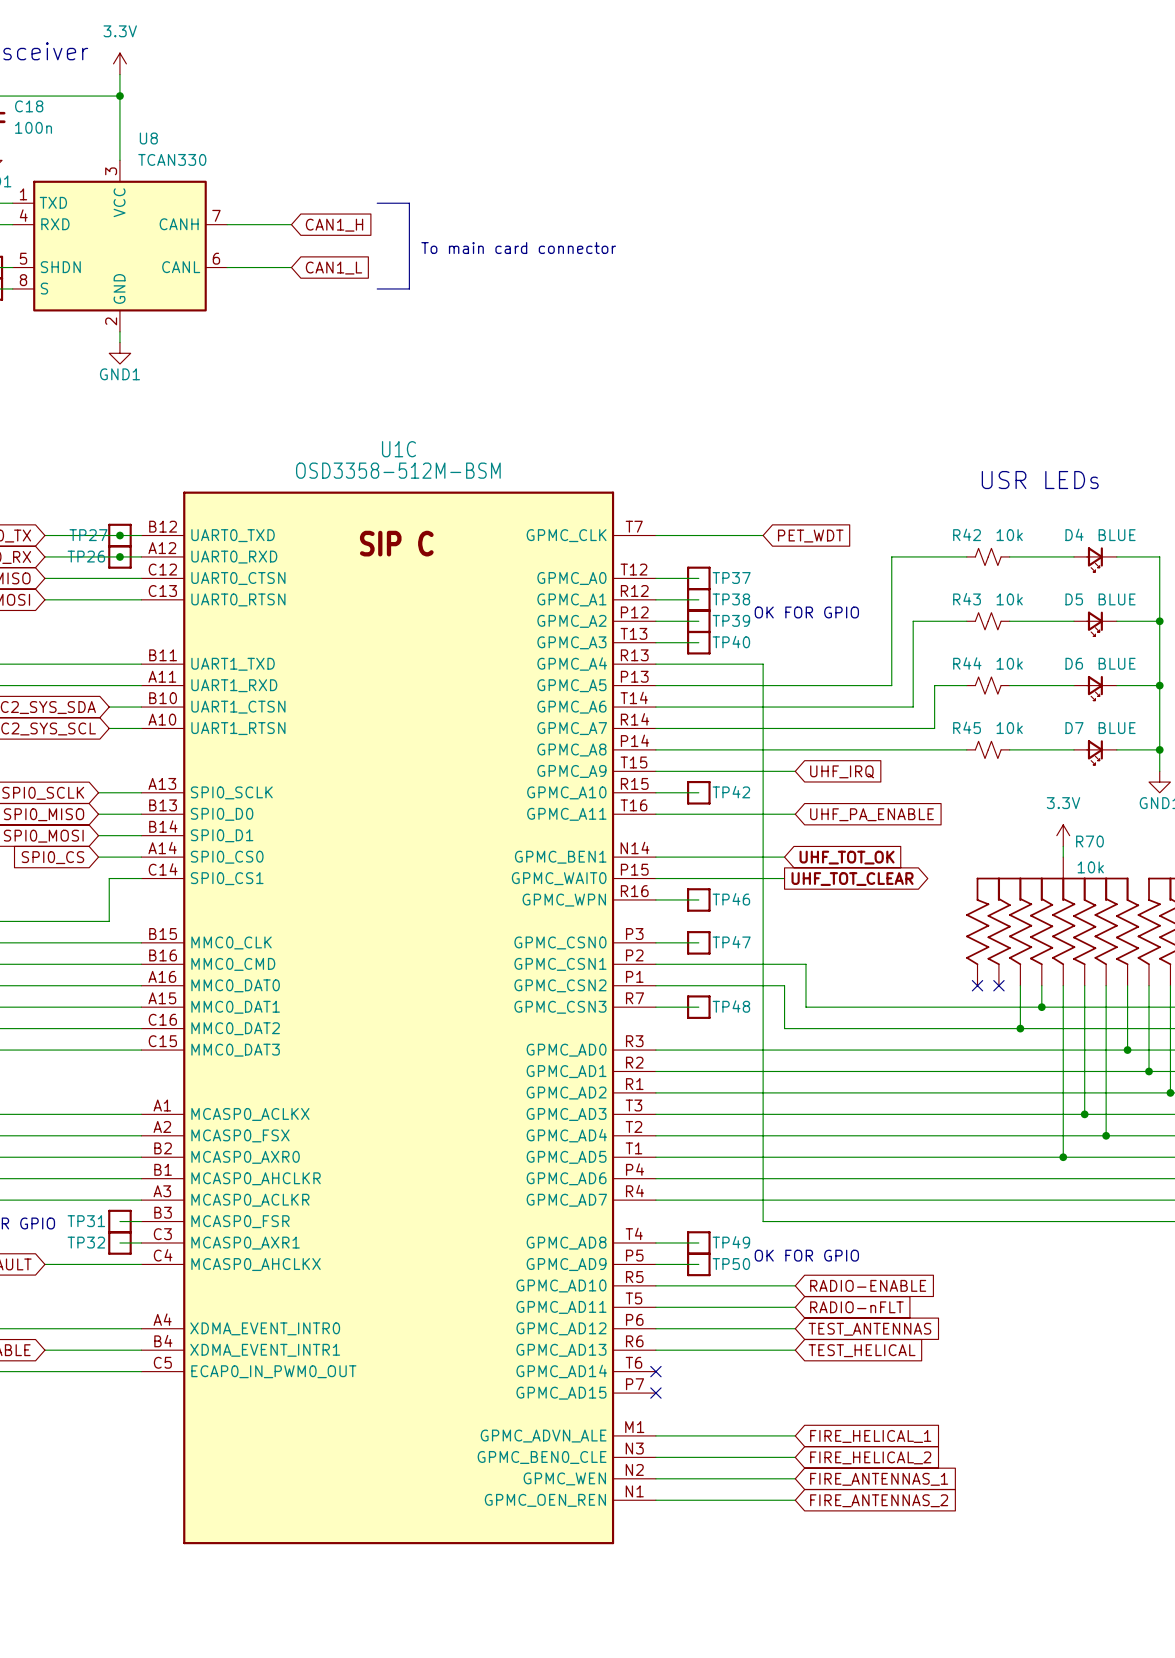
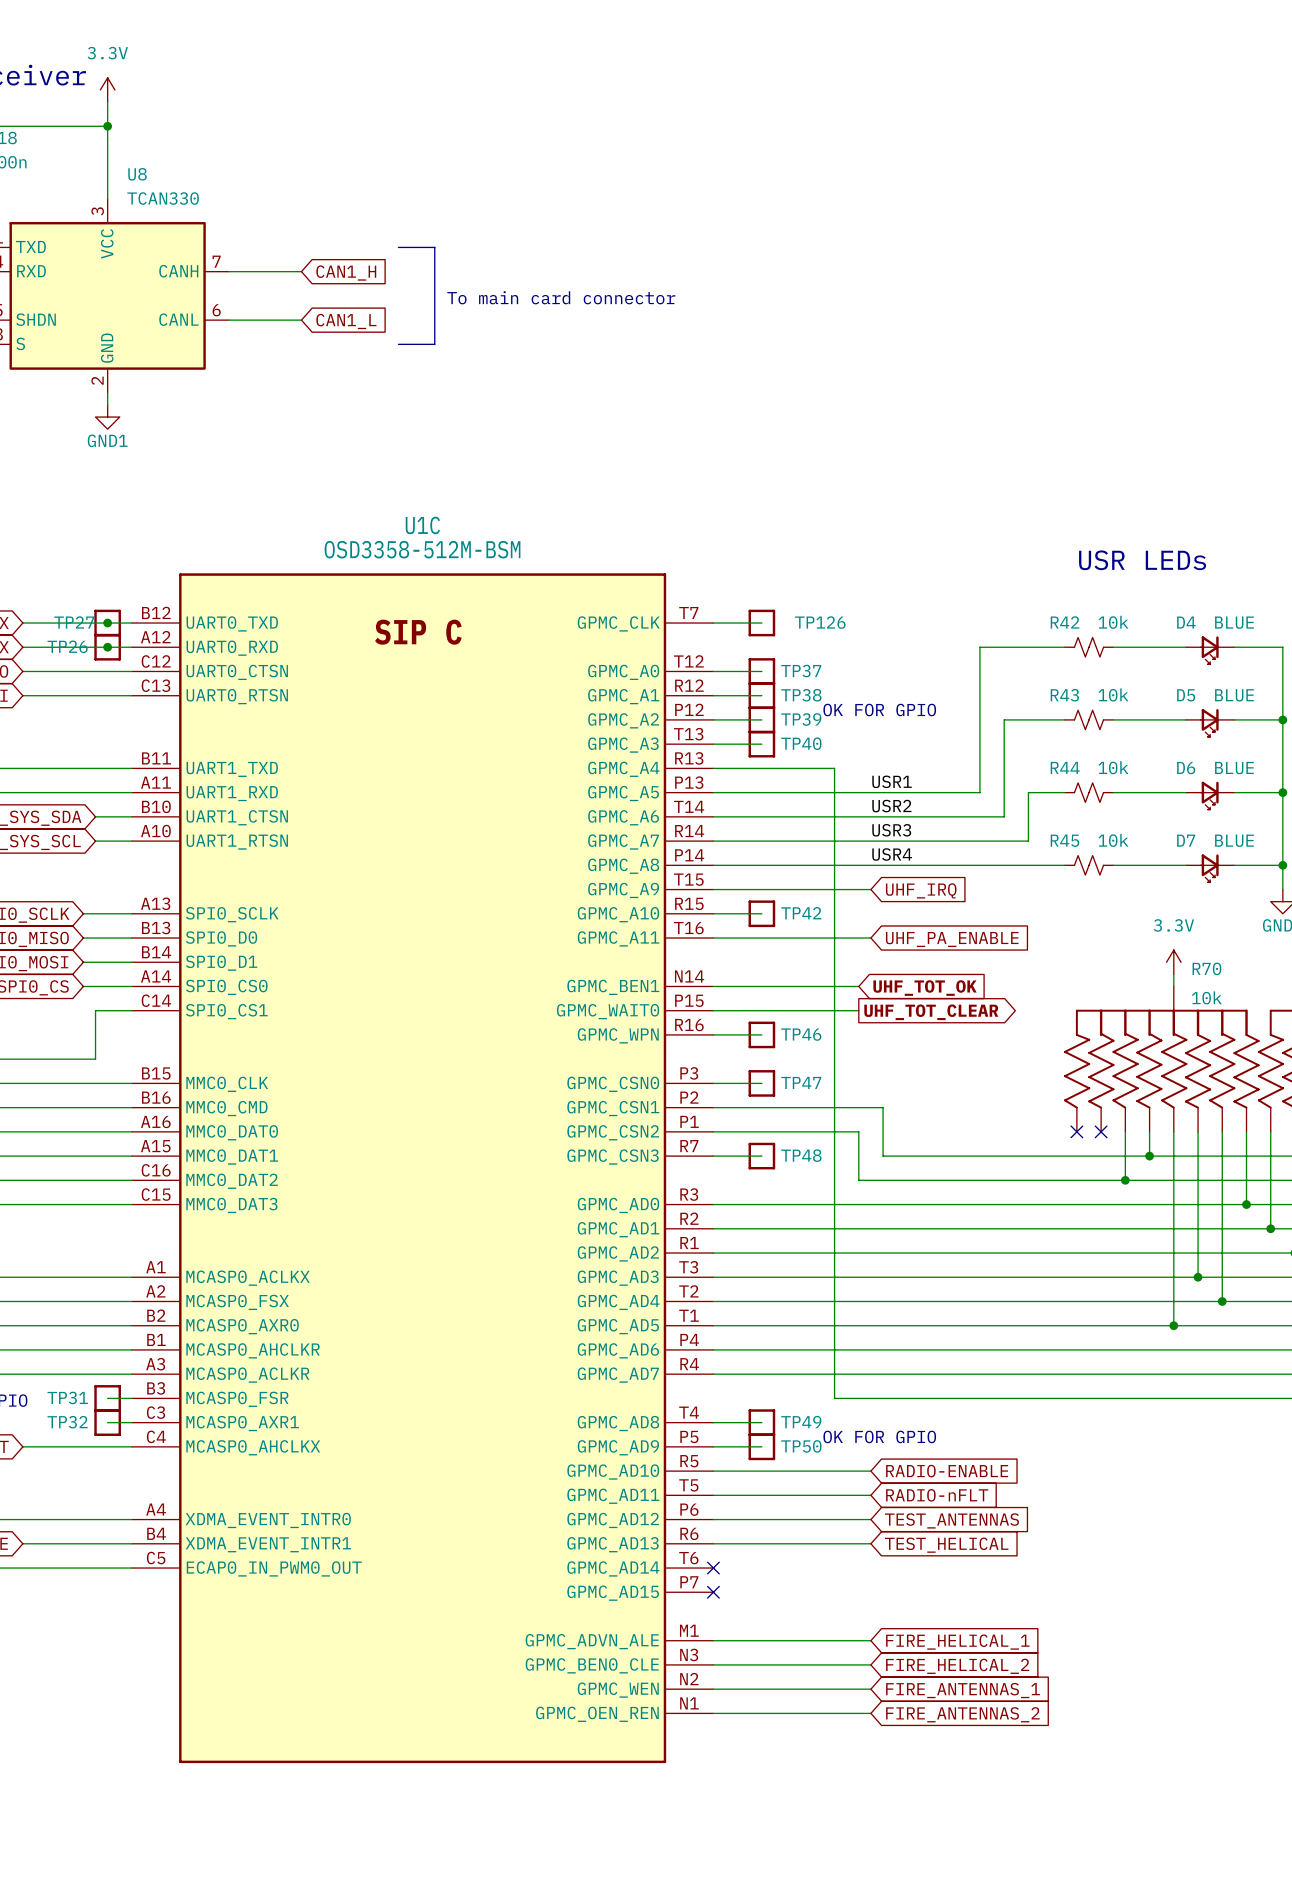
wire: (698, 535) (763, 535) -> none
TP126: none -> (761, 623)
global label: PET_WDT (810, 536) -> none
label: none -> USR1 (892, 781)
label: none -> USR2 (891, 806)
label: none -> USR3 (891, 830)
label: none -> USR4 (892, 854)

